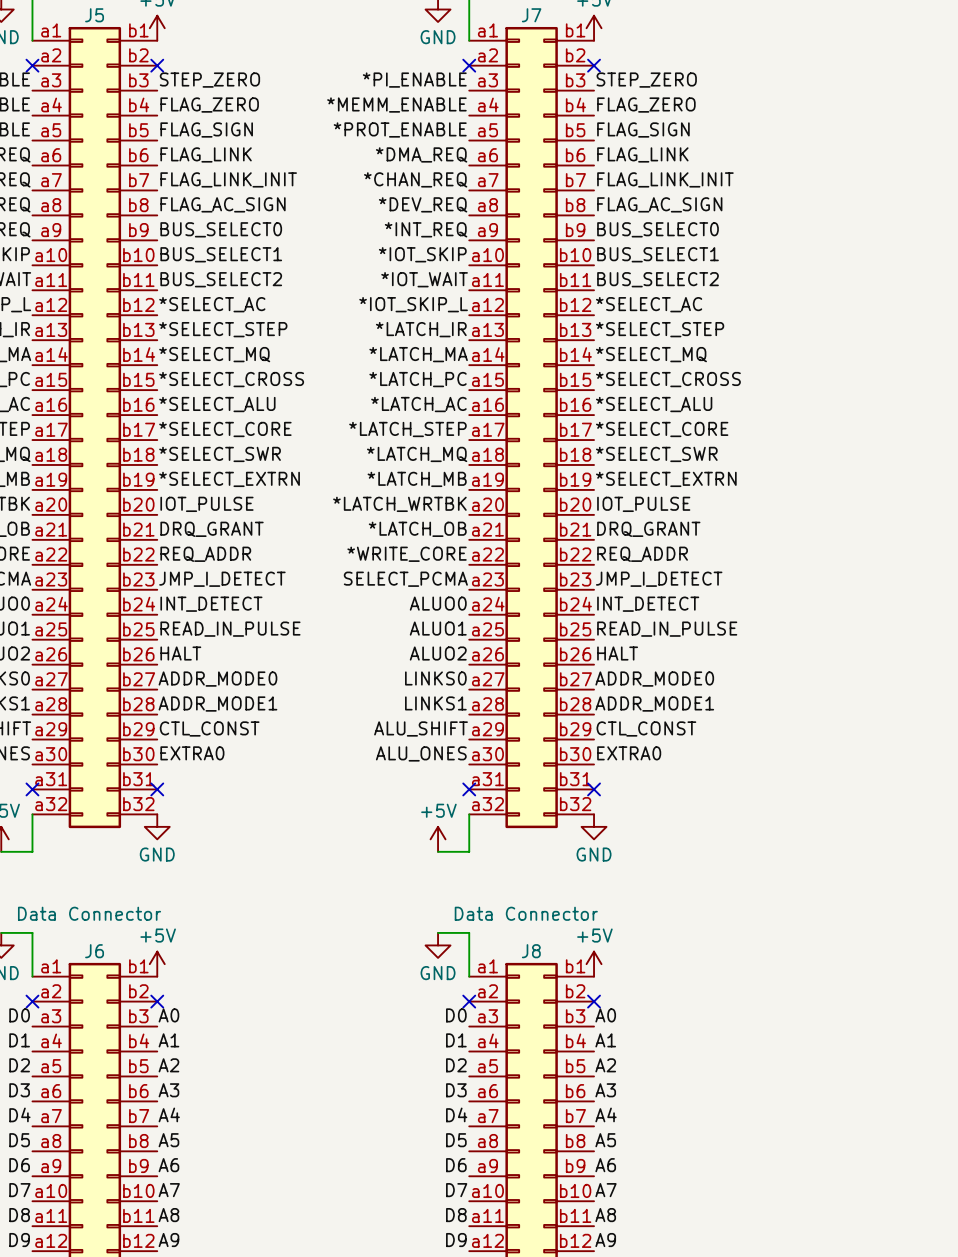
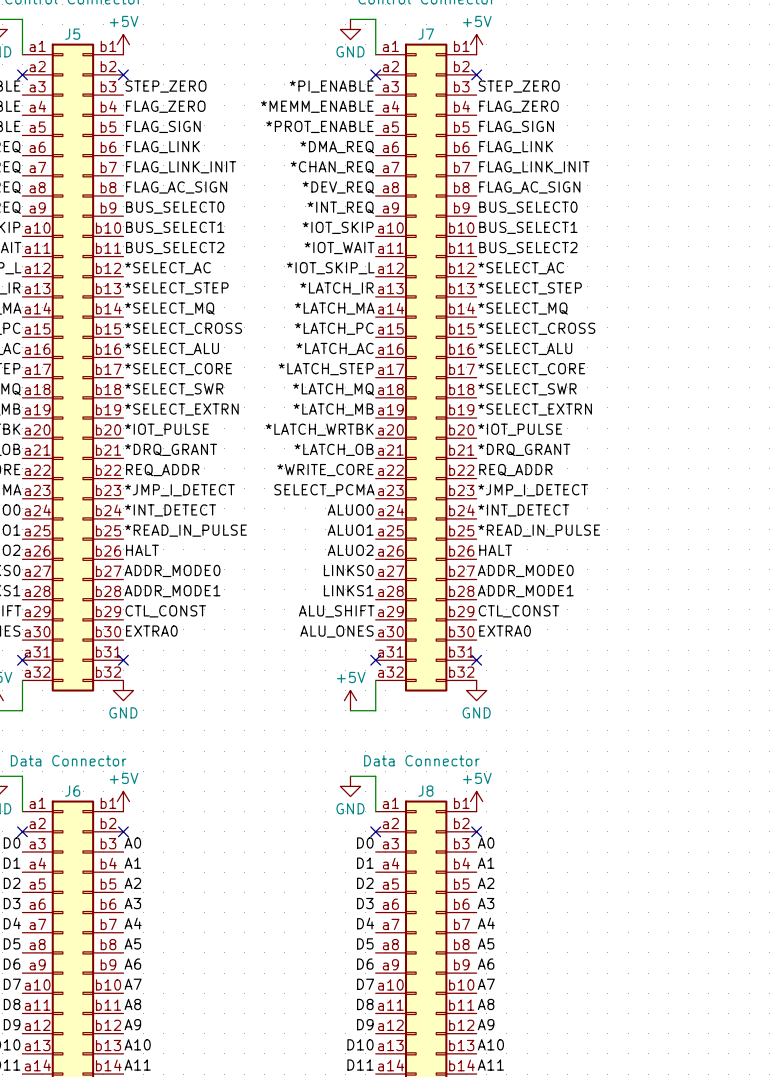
label: IOT_PULSE (206, 504) -> *IOT_PULSE (166, 429)
label: IOT_PULSE (643, 504) -> *IOT_PULSE (520, 429)
label: DRQ_GRANT (212, 529) -> *DRQ_GRANT (171, 449)
label: DRQ_GRANT (648, 529) -> *DRQ_GRANT (524, 449)
label: JMP_I_DETECT (222, 579) -> *JMP_I_DETECT (179, 490)
label: JMP_I_DETECT (659, 579) -> *JMP_I_DETECT (533, 490)
label: INT_DETECT (211, 604) -> *INT_DETECT (170, 510)
label: INT_DETECT (648, 604) -> *INT_DETECT (523, 510)
label: READ_IN_PULSE (230, 629) -> *READ_IN_PULSE (185, 530)
label: READ_IN_PULSE (667, 629) -> *READ_IN_PULSE (539, 530)

